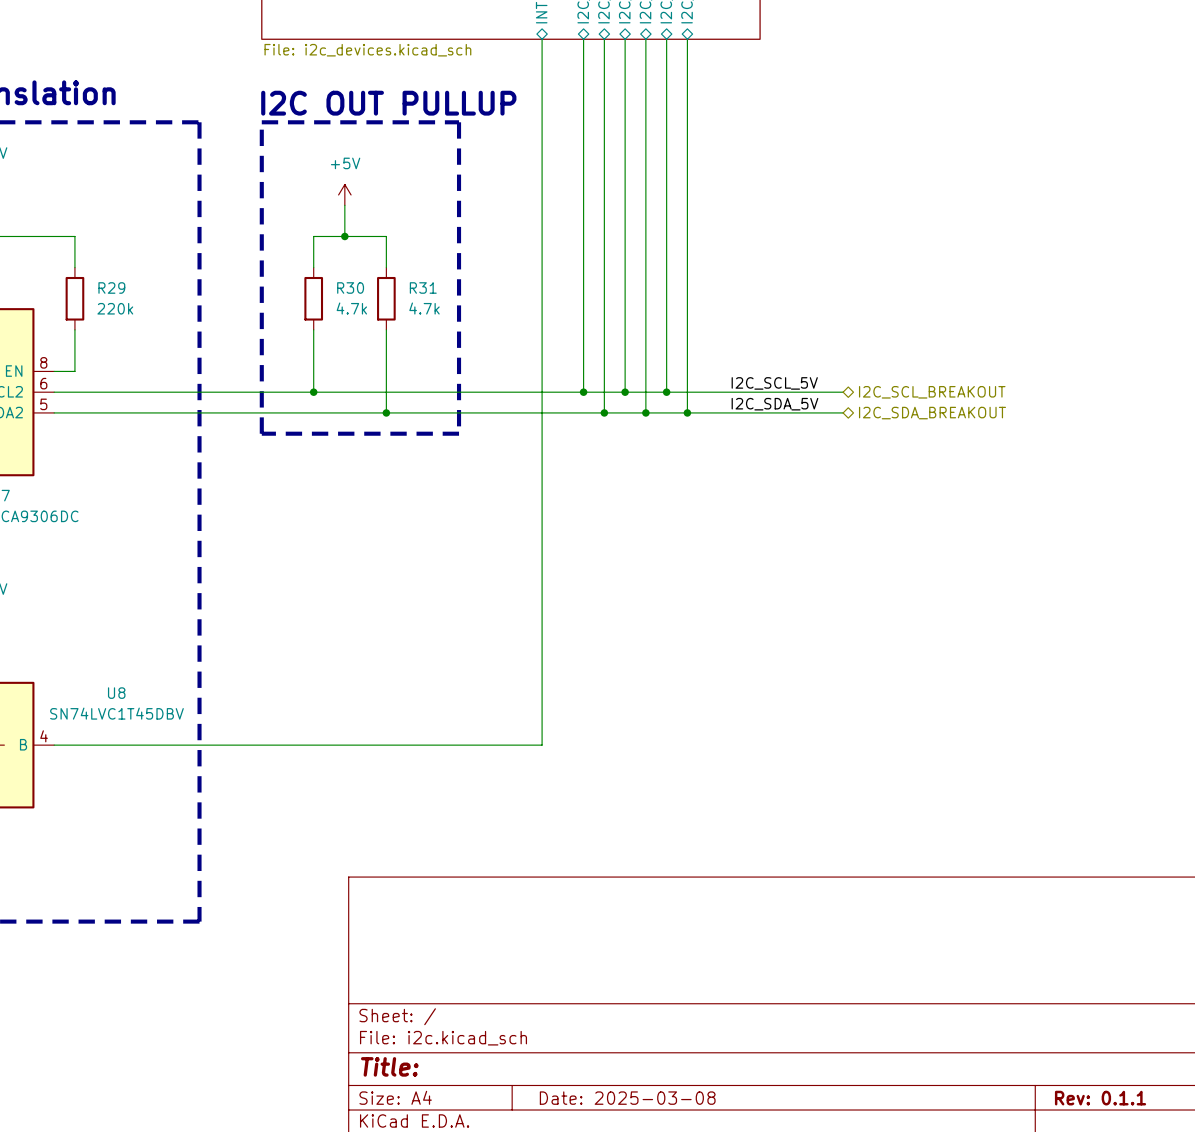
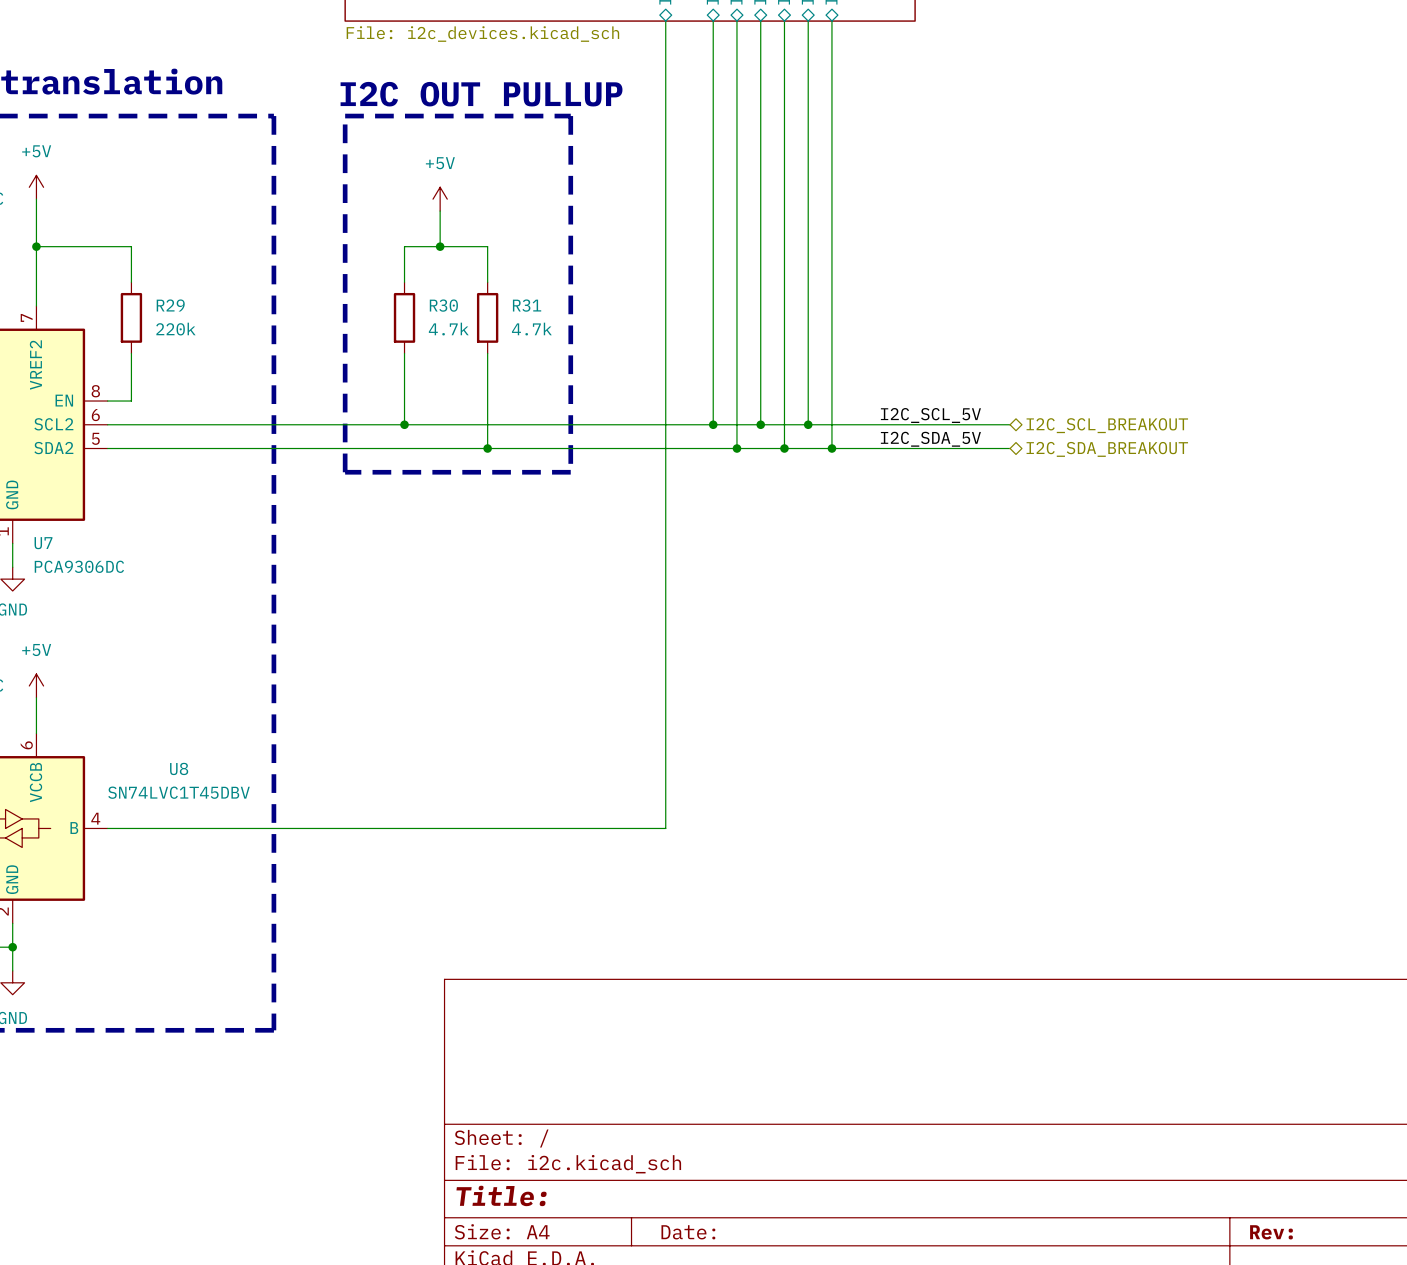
title block: Date: 2025-03-08 (627, 1098) -> Date: (688, 1232)
title block: Rev: 0.1.1 (1100, 1098) -> Rev: (1271, 1232)

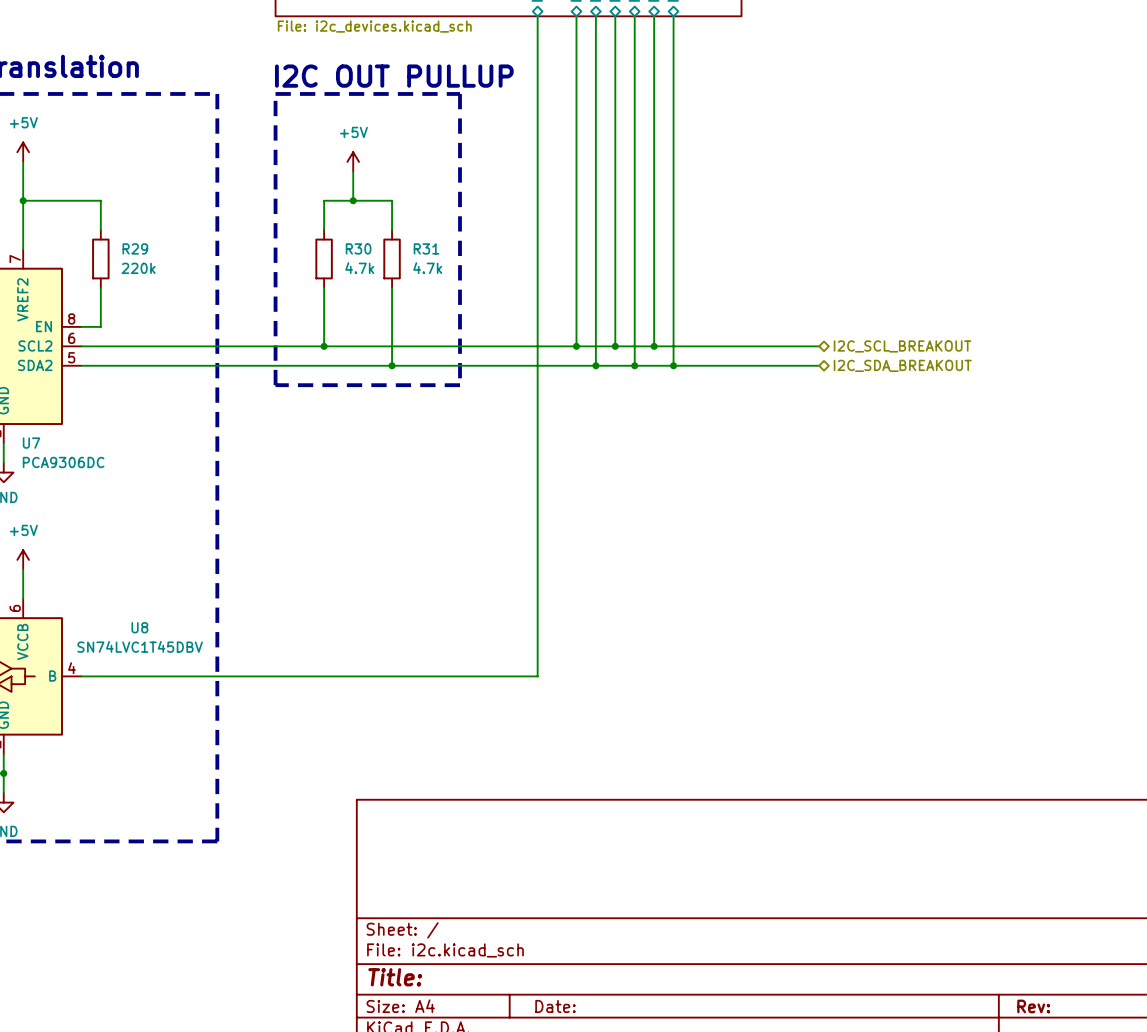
label: I2C_SCL_5V (930, 415) -> none
label: I2C_SDA_5V (930, 439) -> none

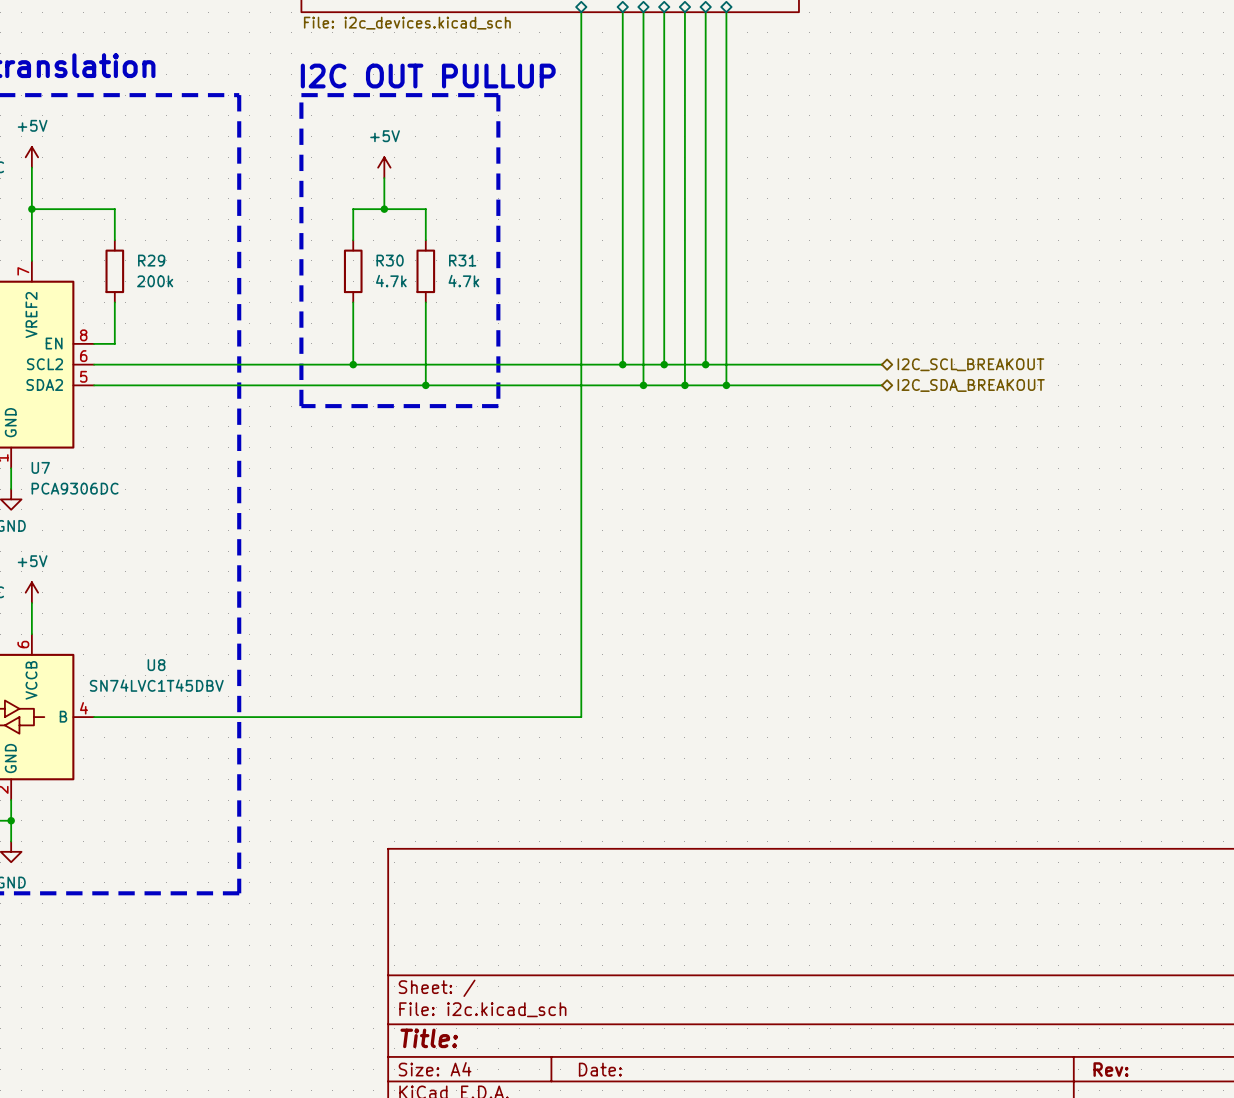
R29 value: 220k (138, 268) -> 200k (155, 281)

